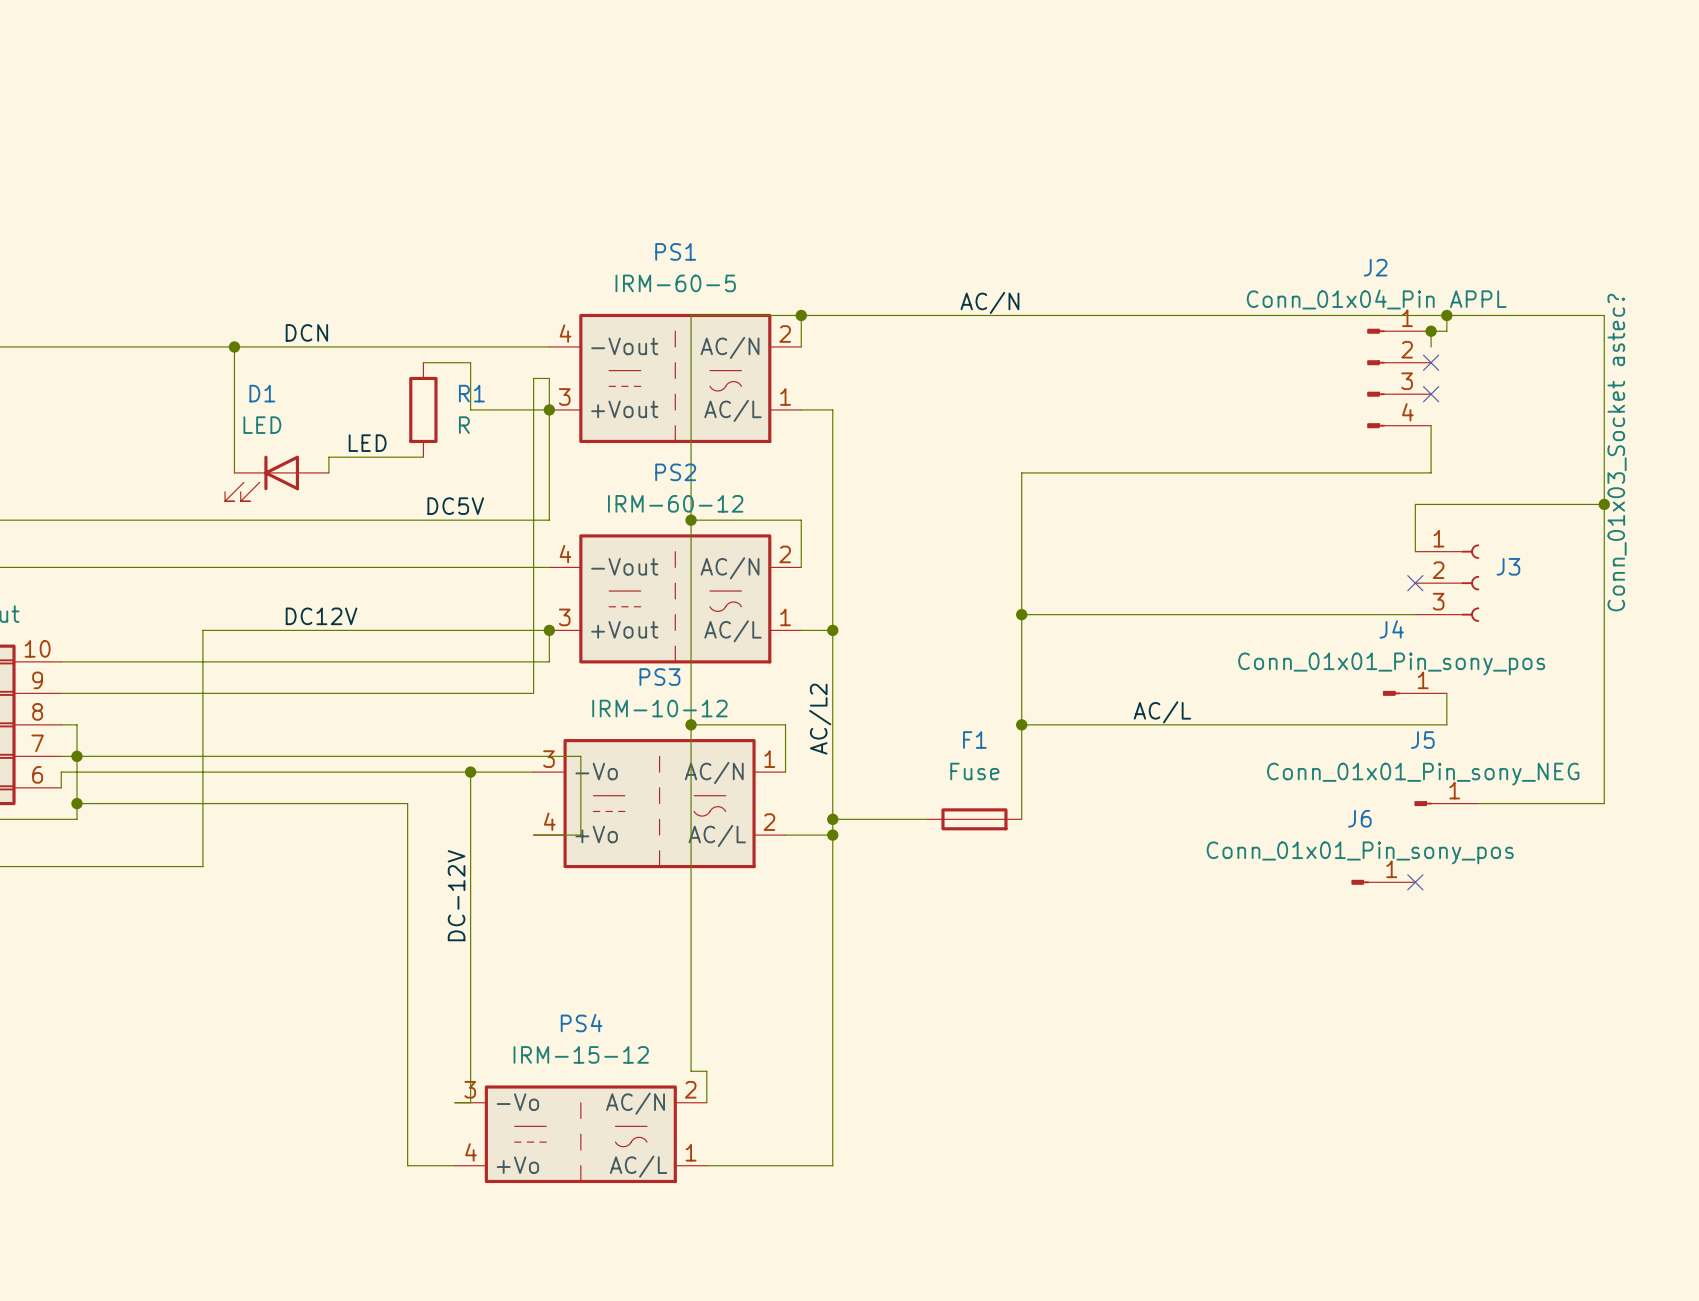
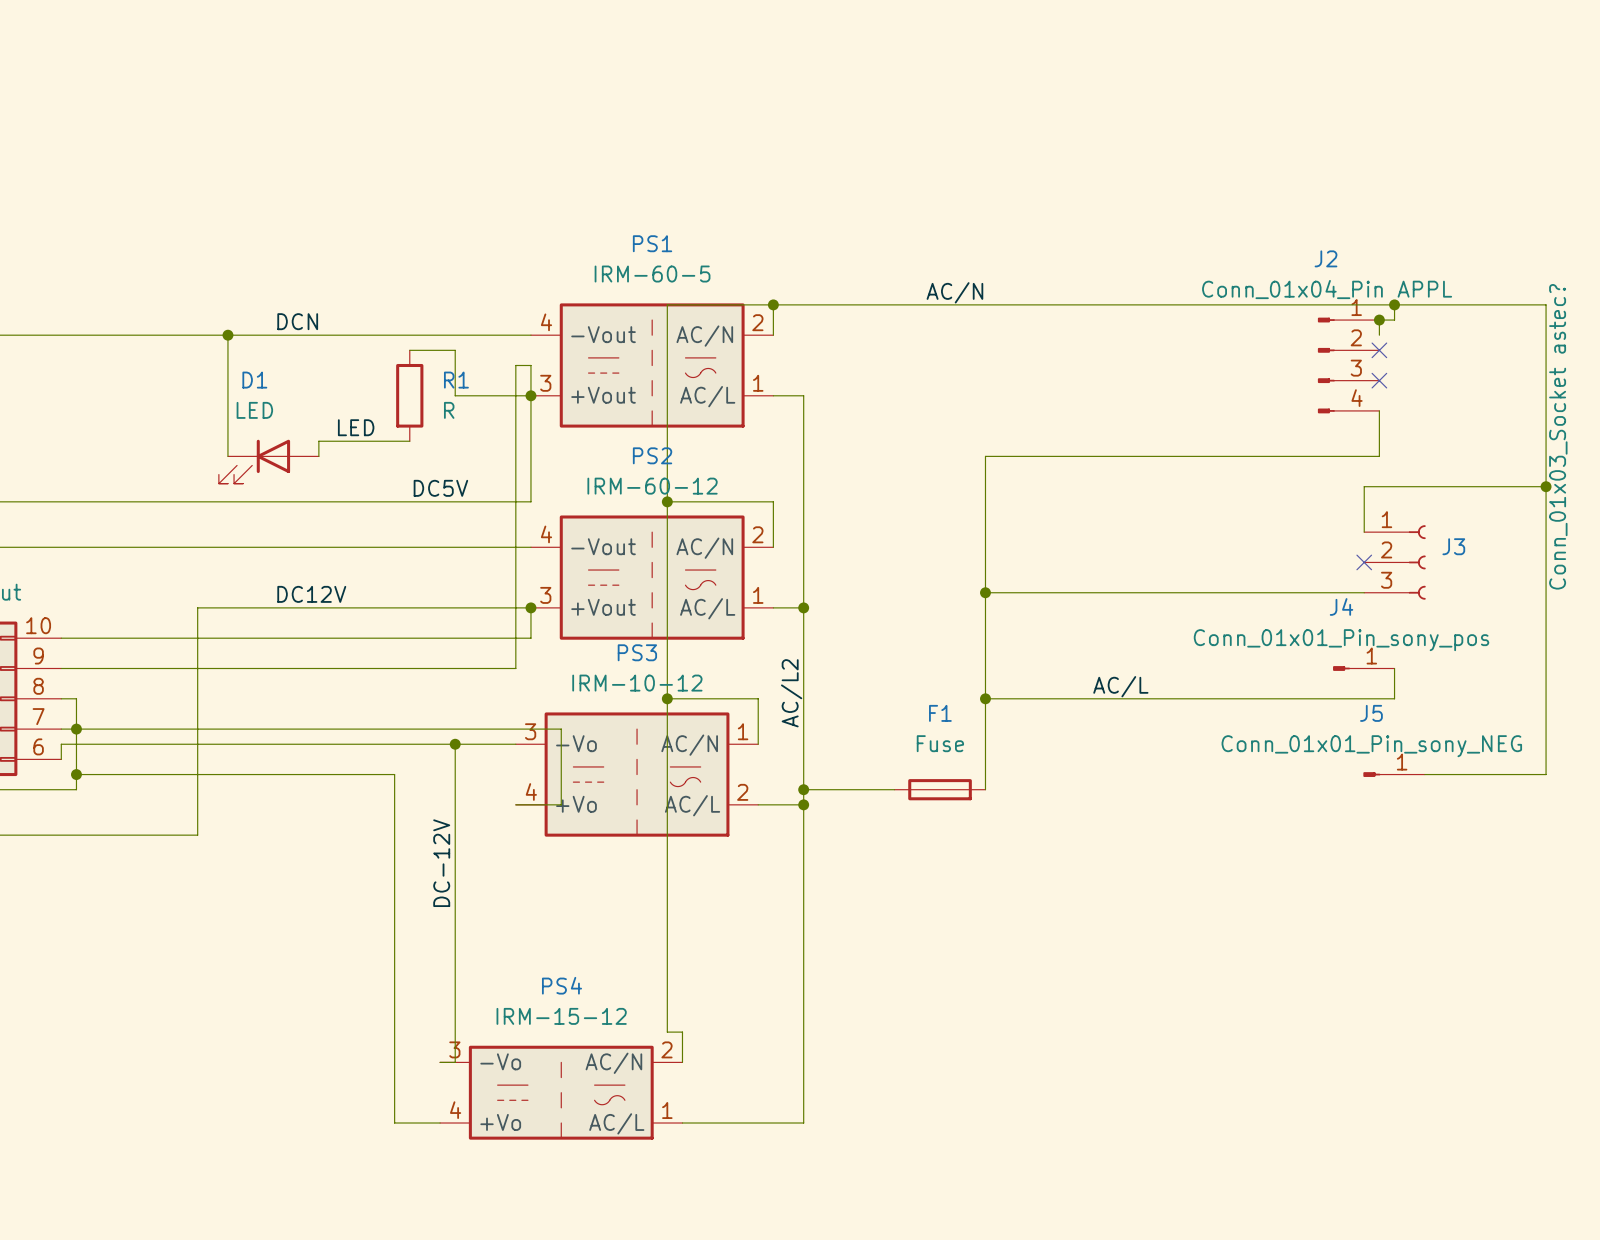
J6: Conn_01x01_Pin_sony_pos (1383, 882) -> none
no-connect mark: (1415, 882) -> none

